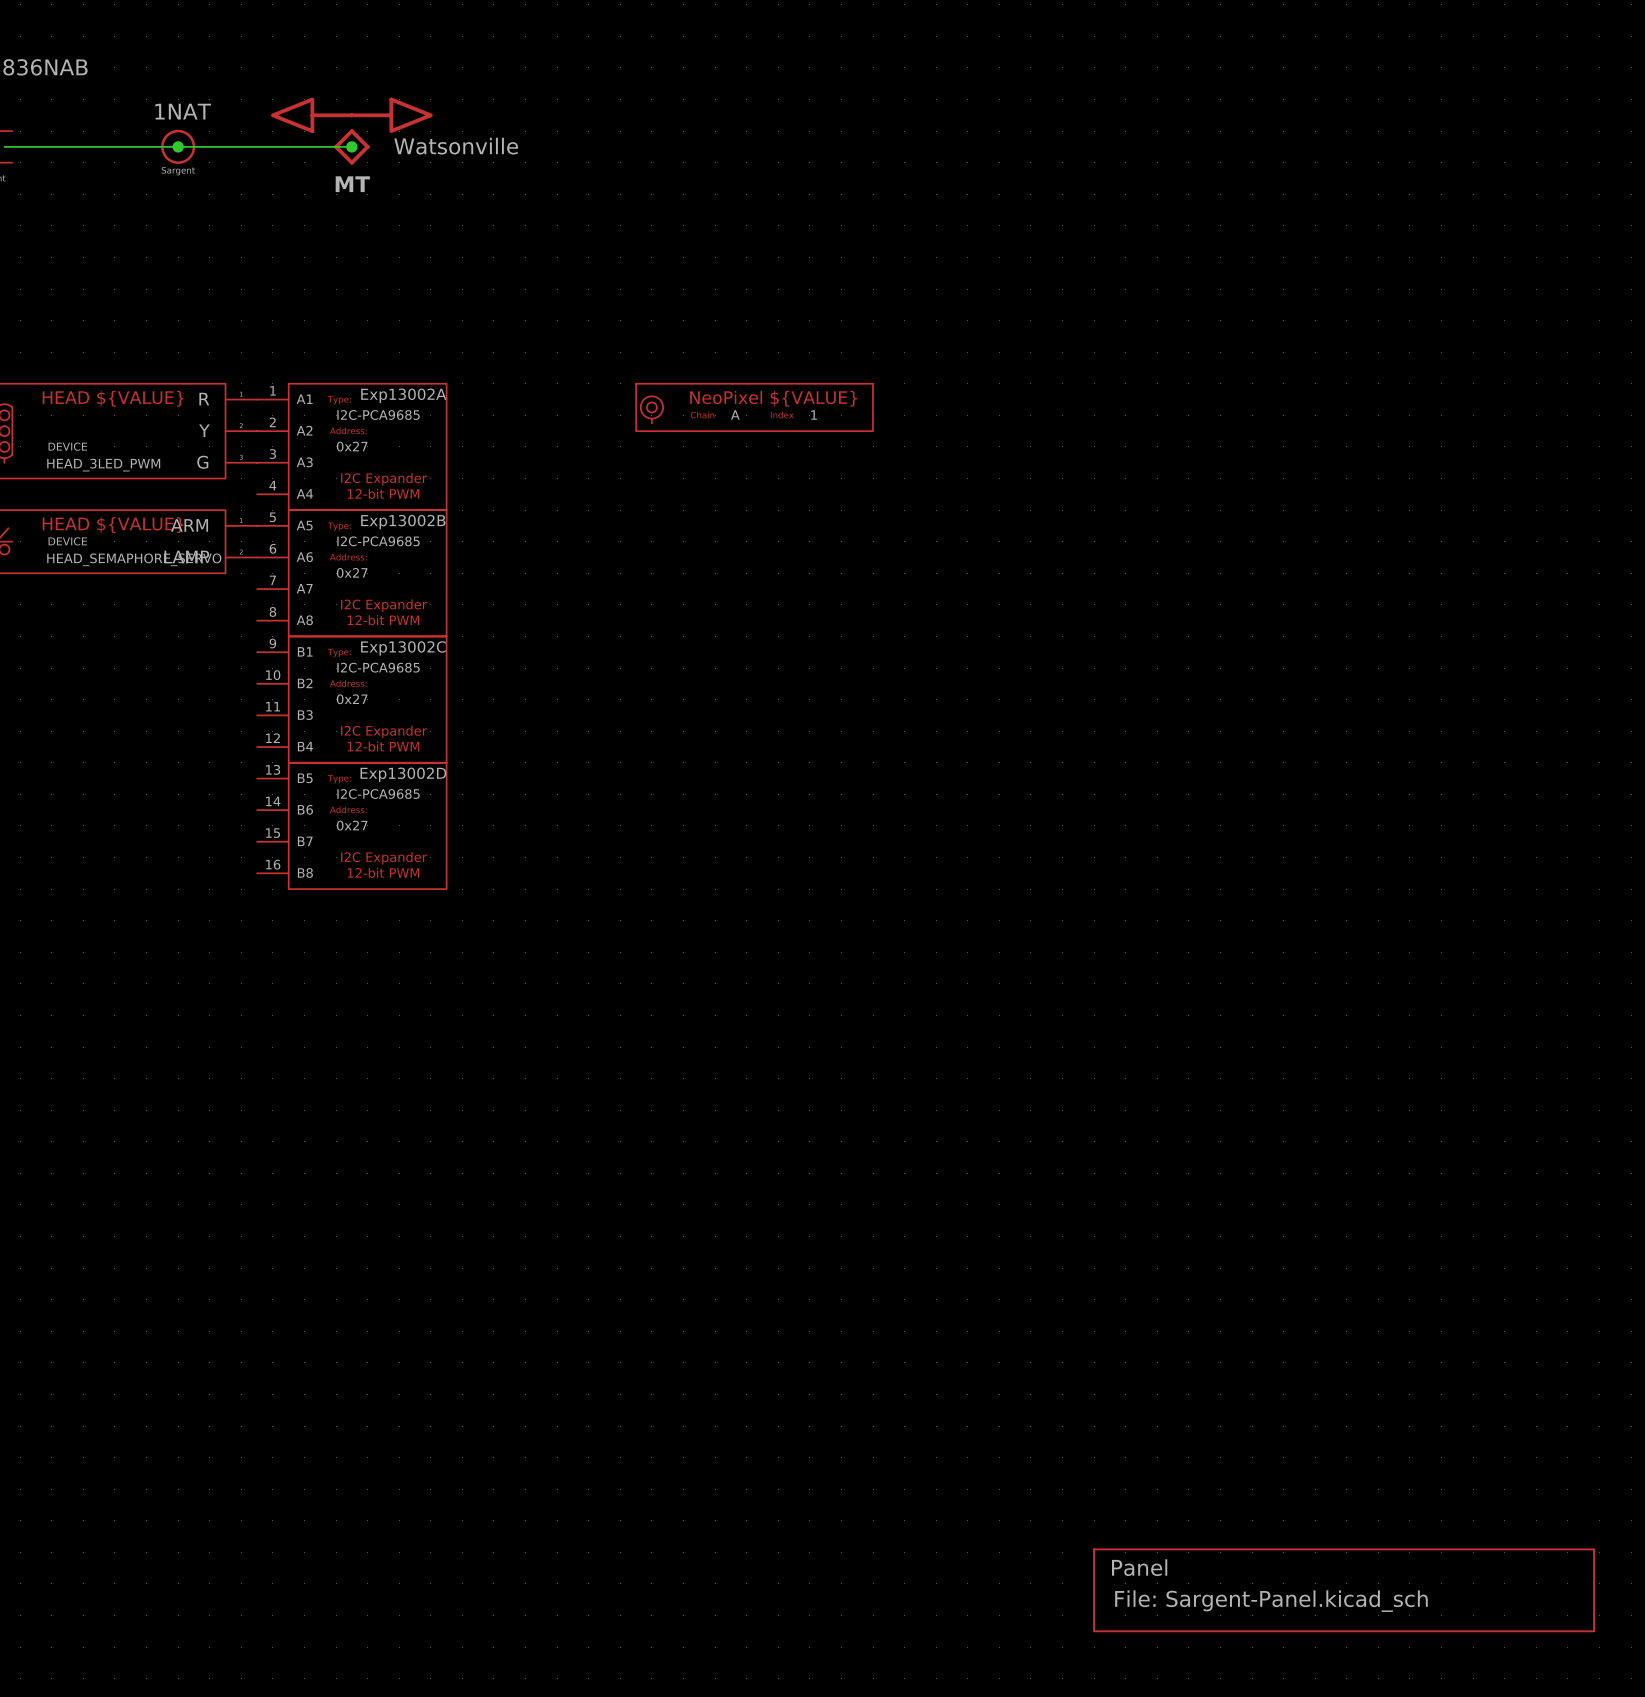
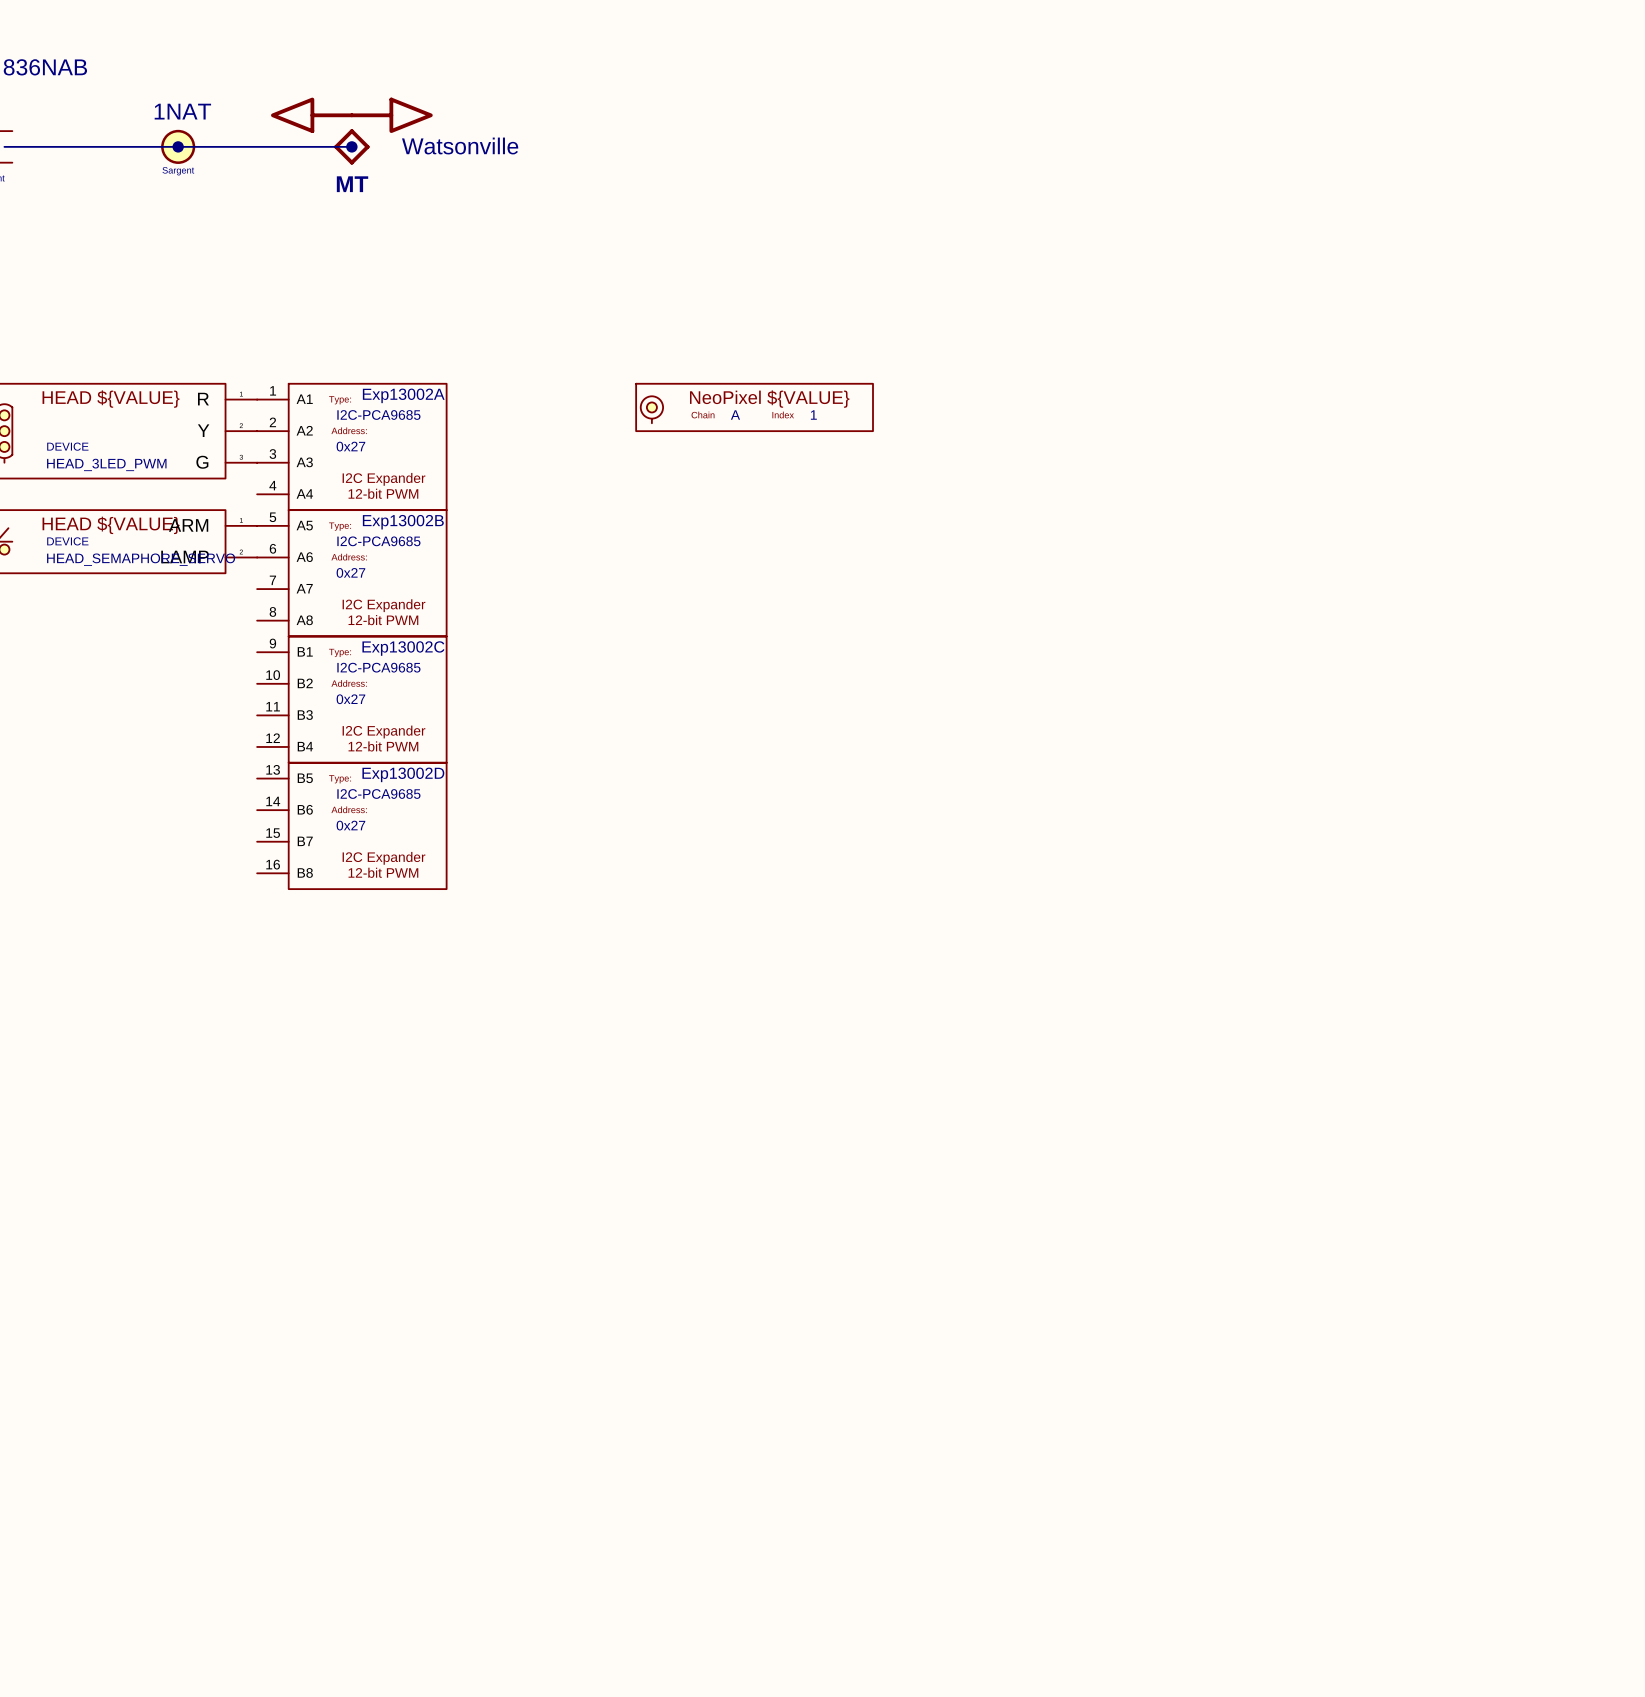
sheet Panel: File: Sargent-Panel.kicad_sch (1344, 1590) -> none

